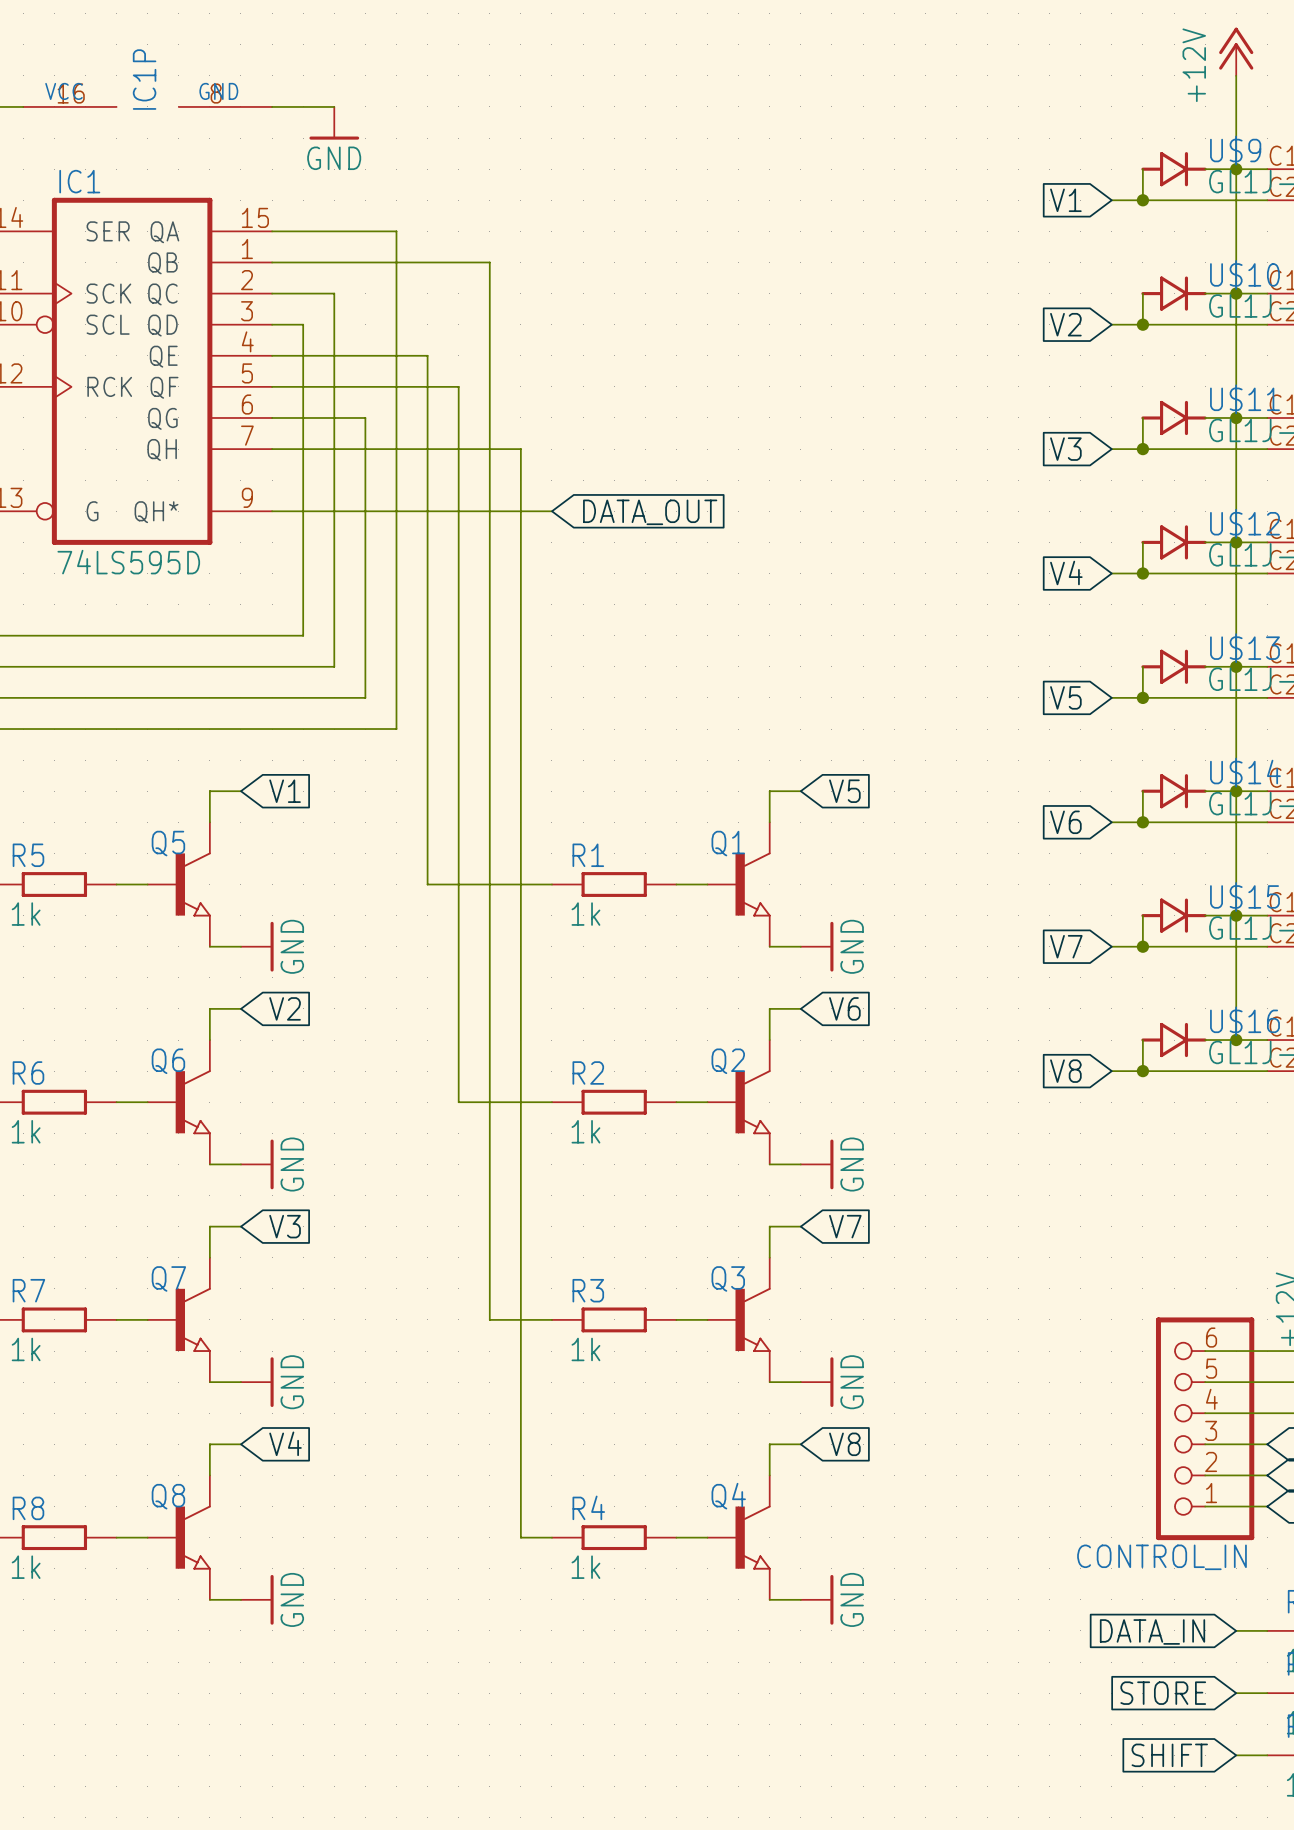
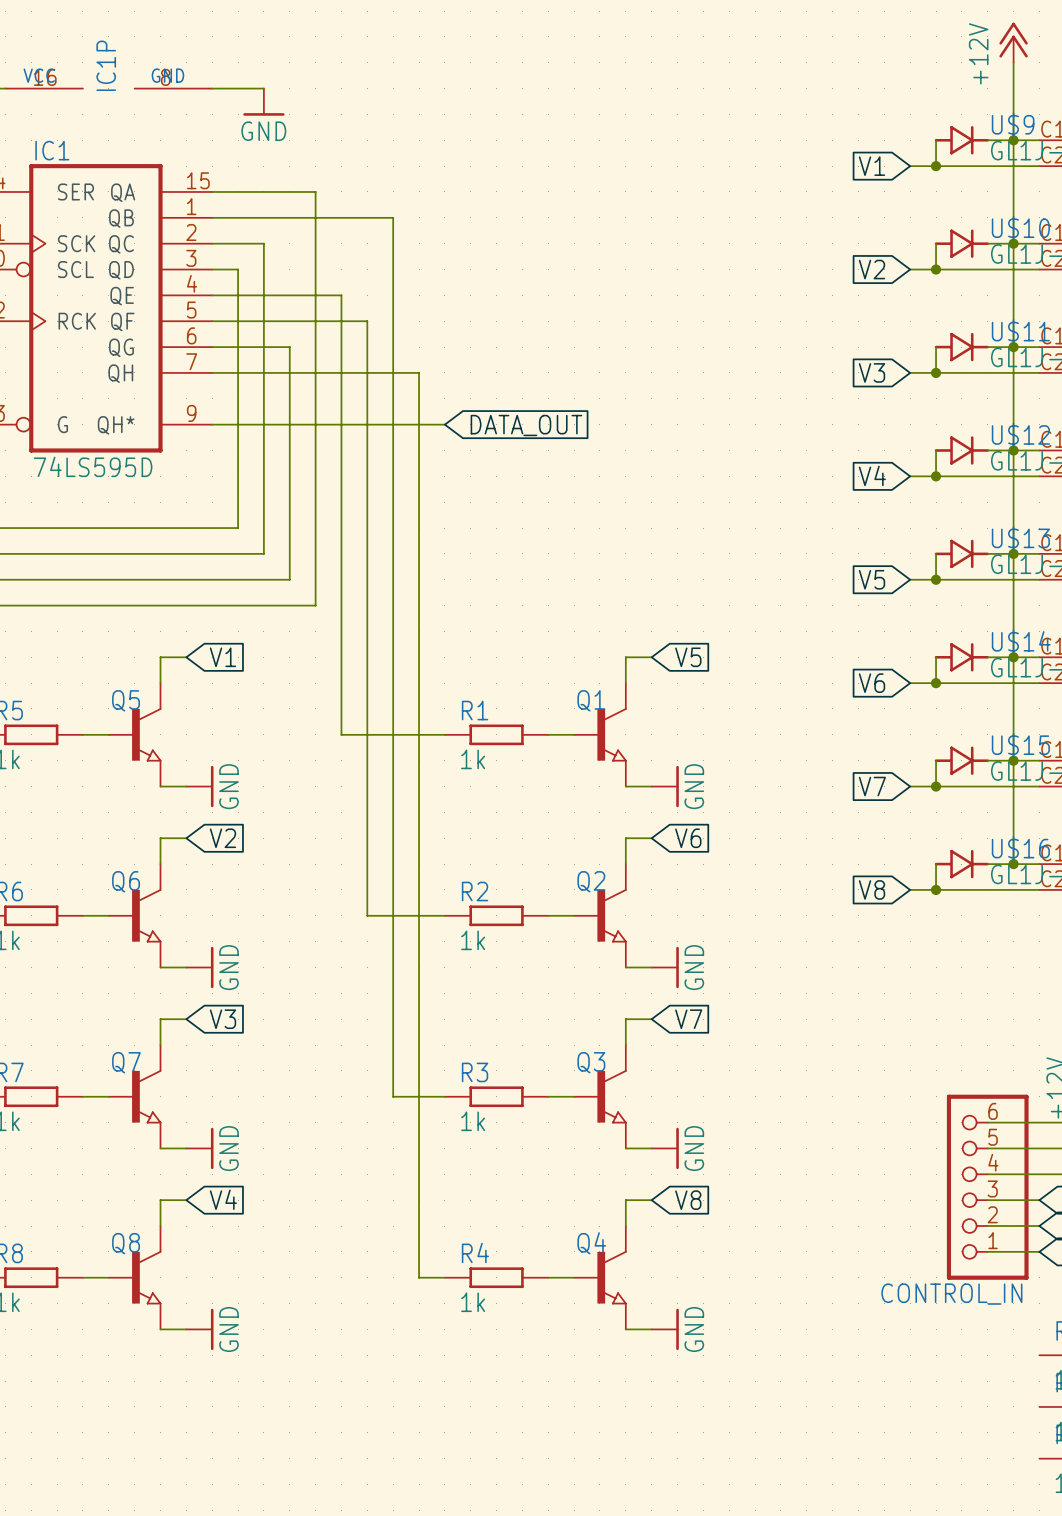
wire: (1236, 1630) (1267, 1630) -> none
global label: DATA_IN (1152, 1631) -> none
global label: STORE (1163, 1693) -> none
wire: (1236, 1693) (1267, 1693) -> none
global label: SHIFT (1169, 1755) -> none
wire: (1236, 1755) (1267, 1755) -> none

